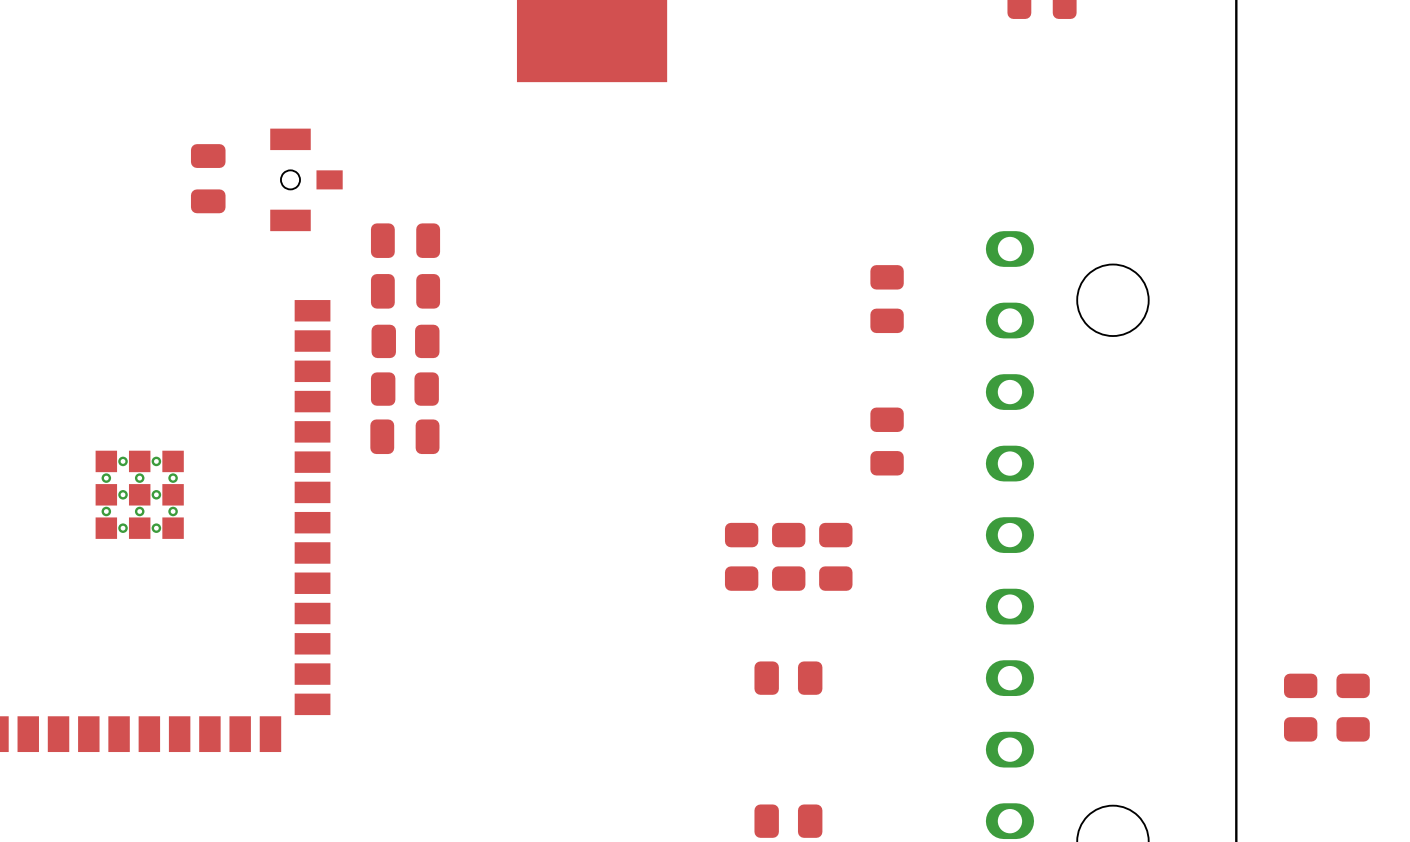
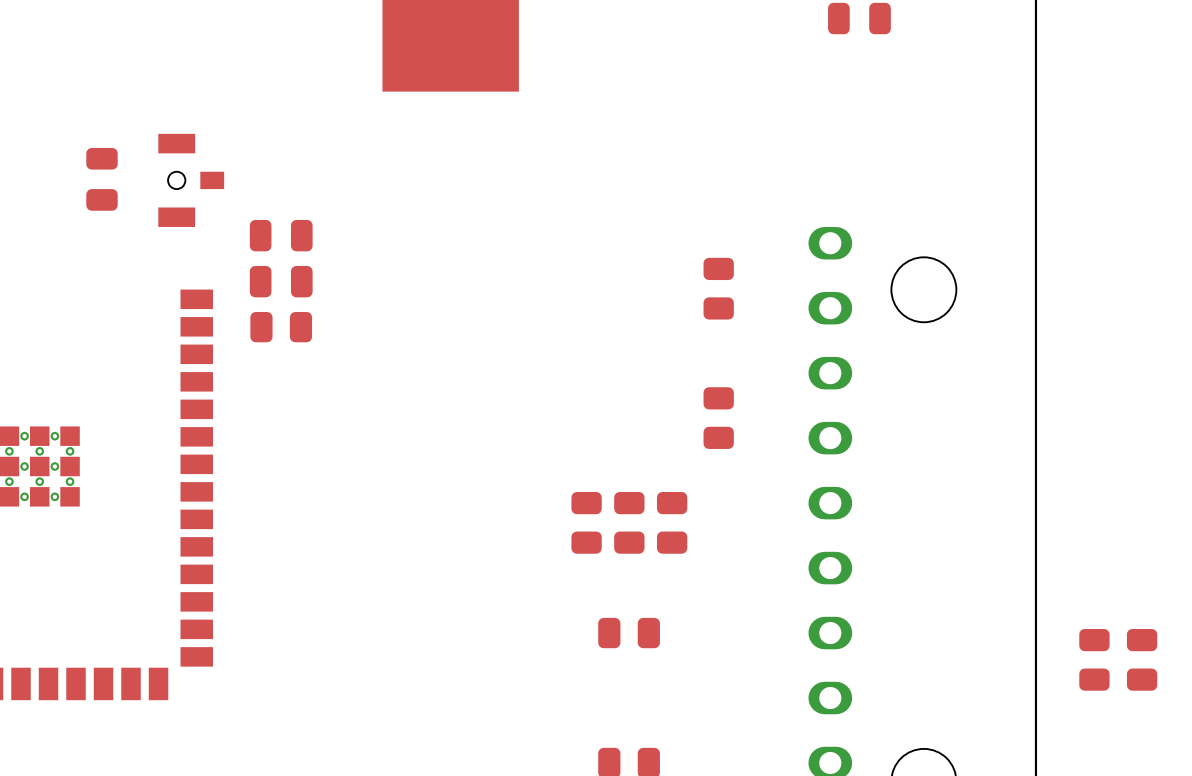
part: (404, 389) -> none
part: (404, 436) -> none

